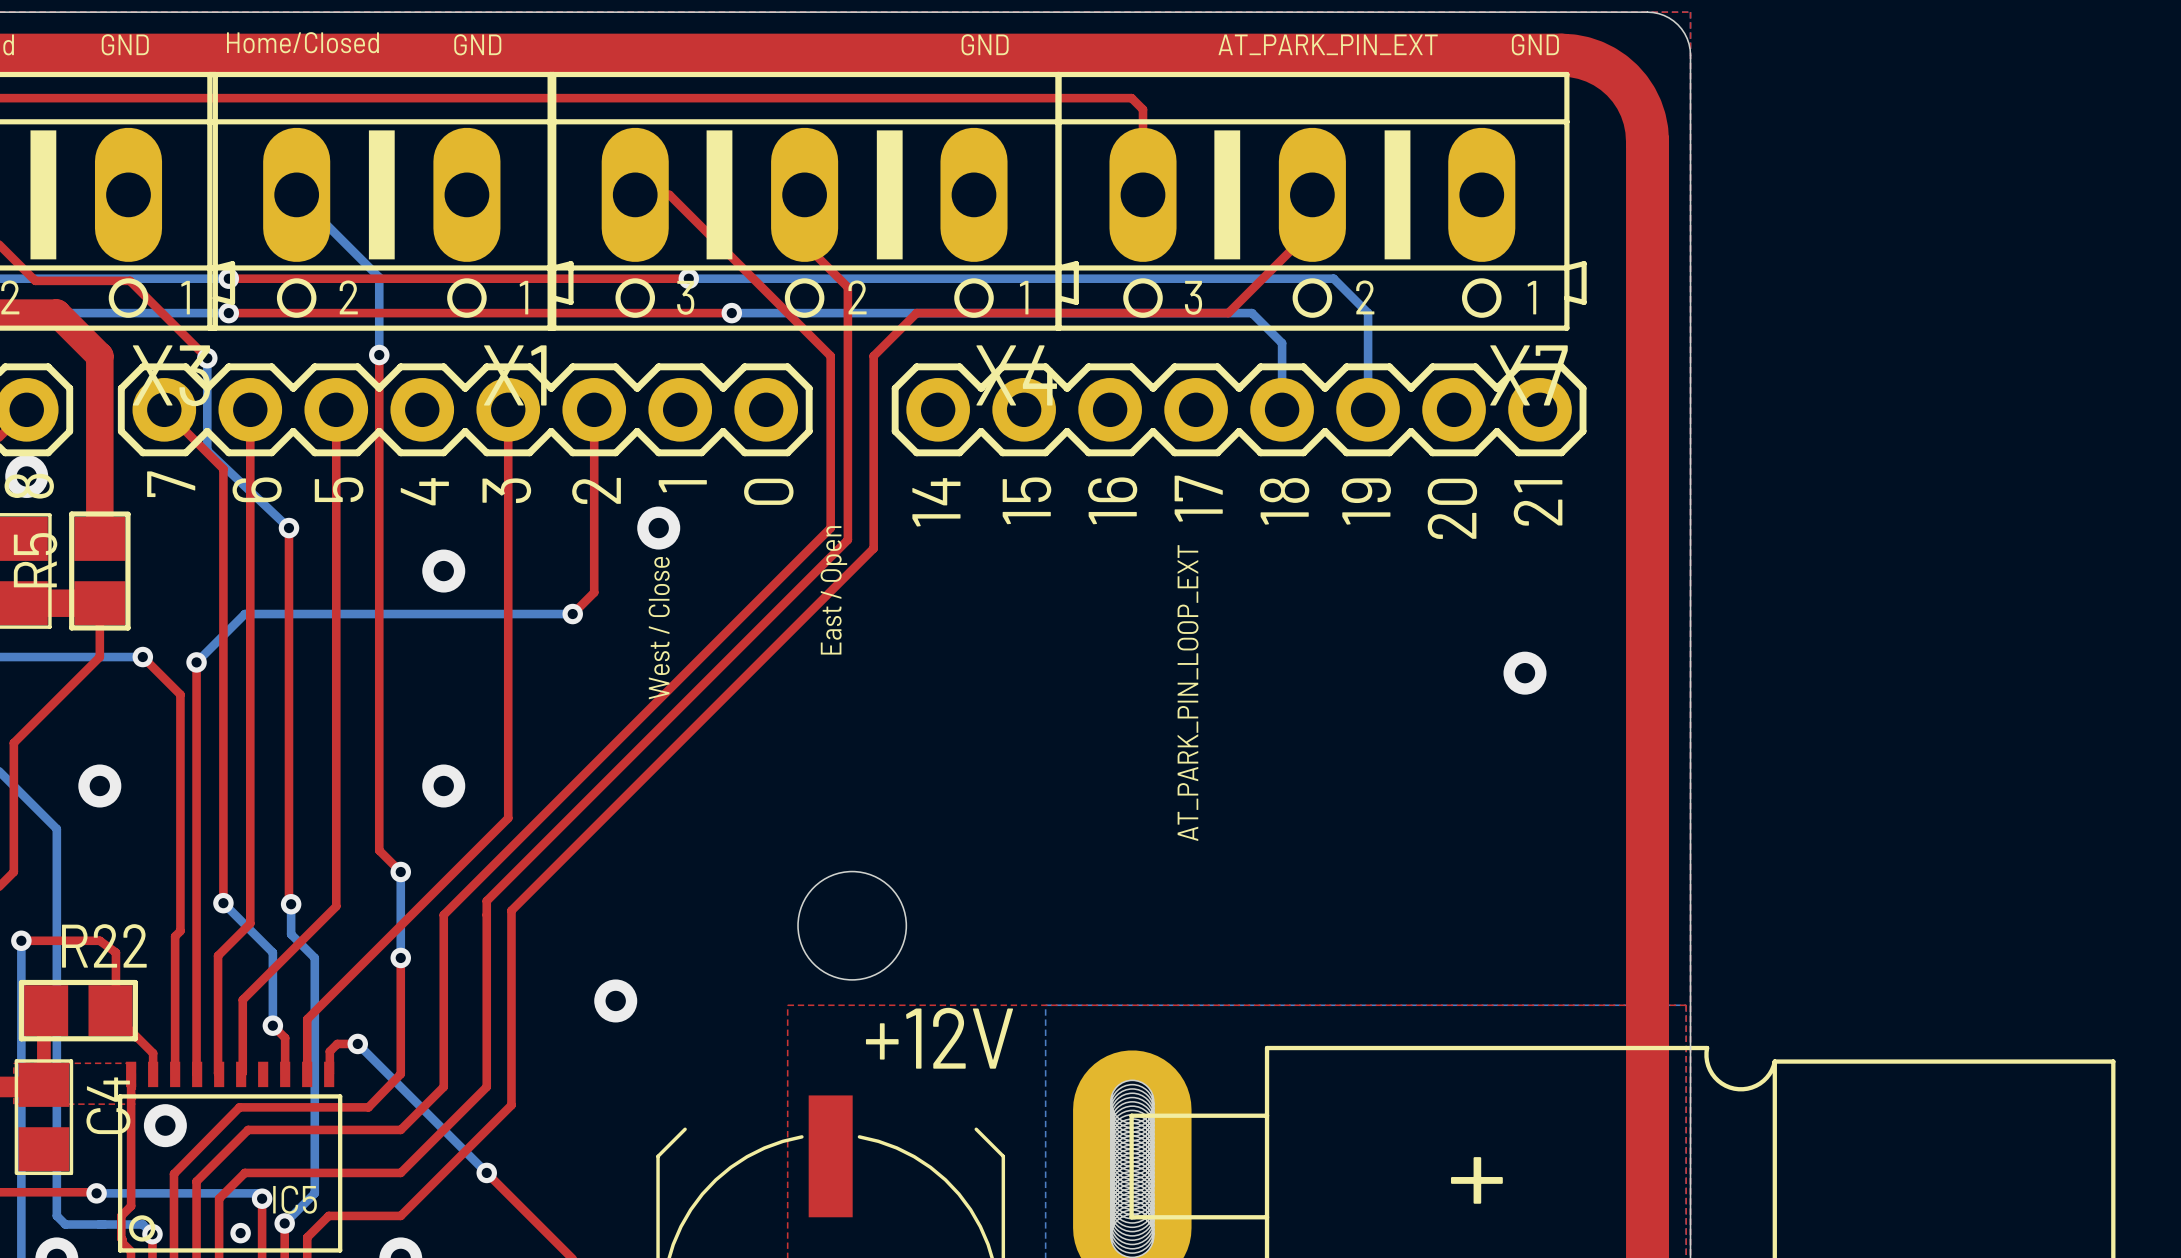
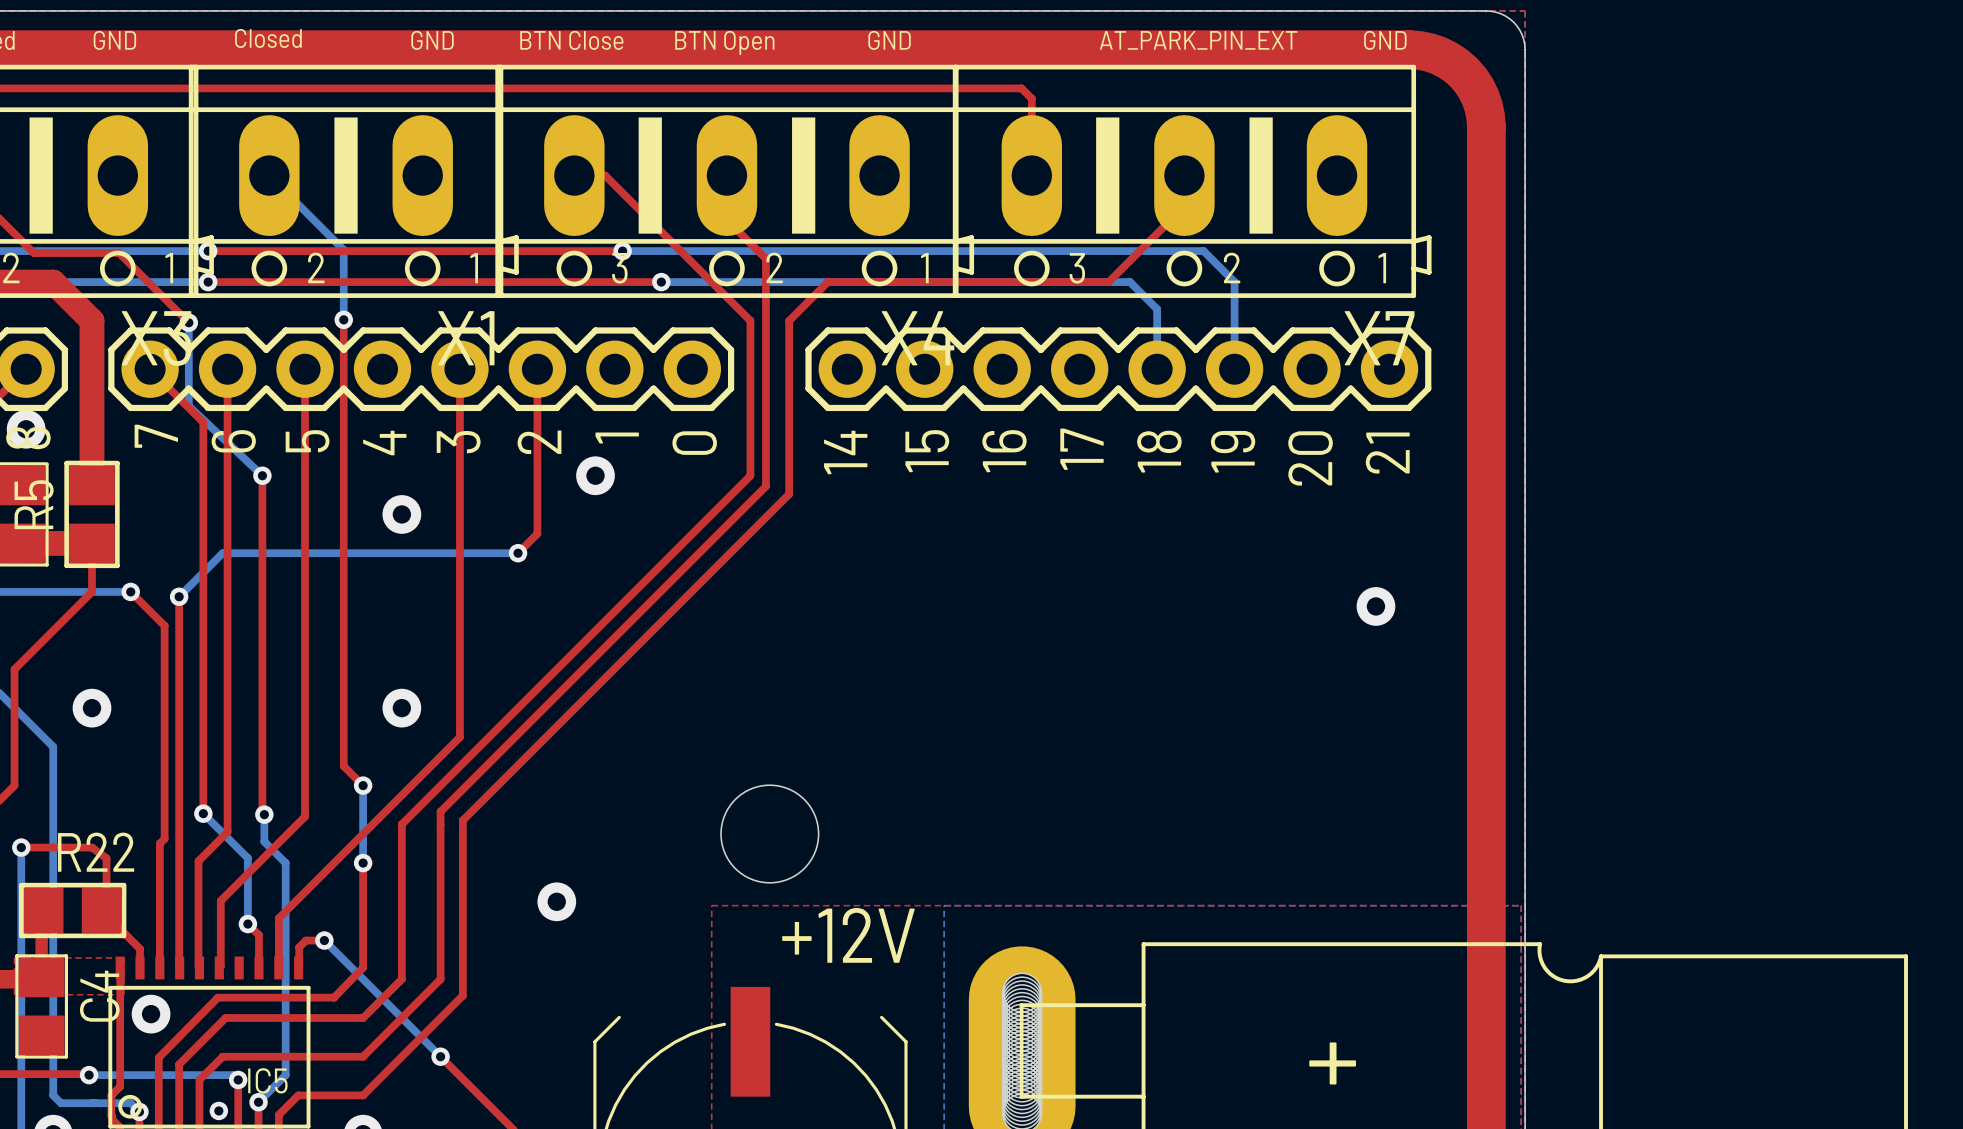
text: Home/Closed (302, 42) -> Closed (268, 38)
text: none -> BTN Close (571, 40)
text: none -> BTN Open (724, 42)
text: East / Open (833, 590) -> none
text: West / Close (659, 628) -> none
text: AT_PARK_PIN_LOOP_EXT (1187, 693) -> none

